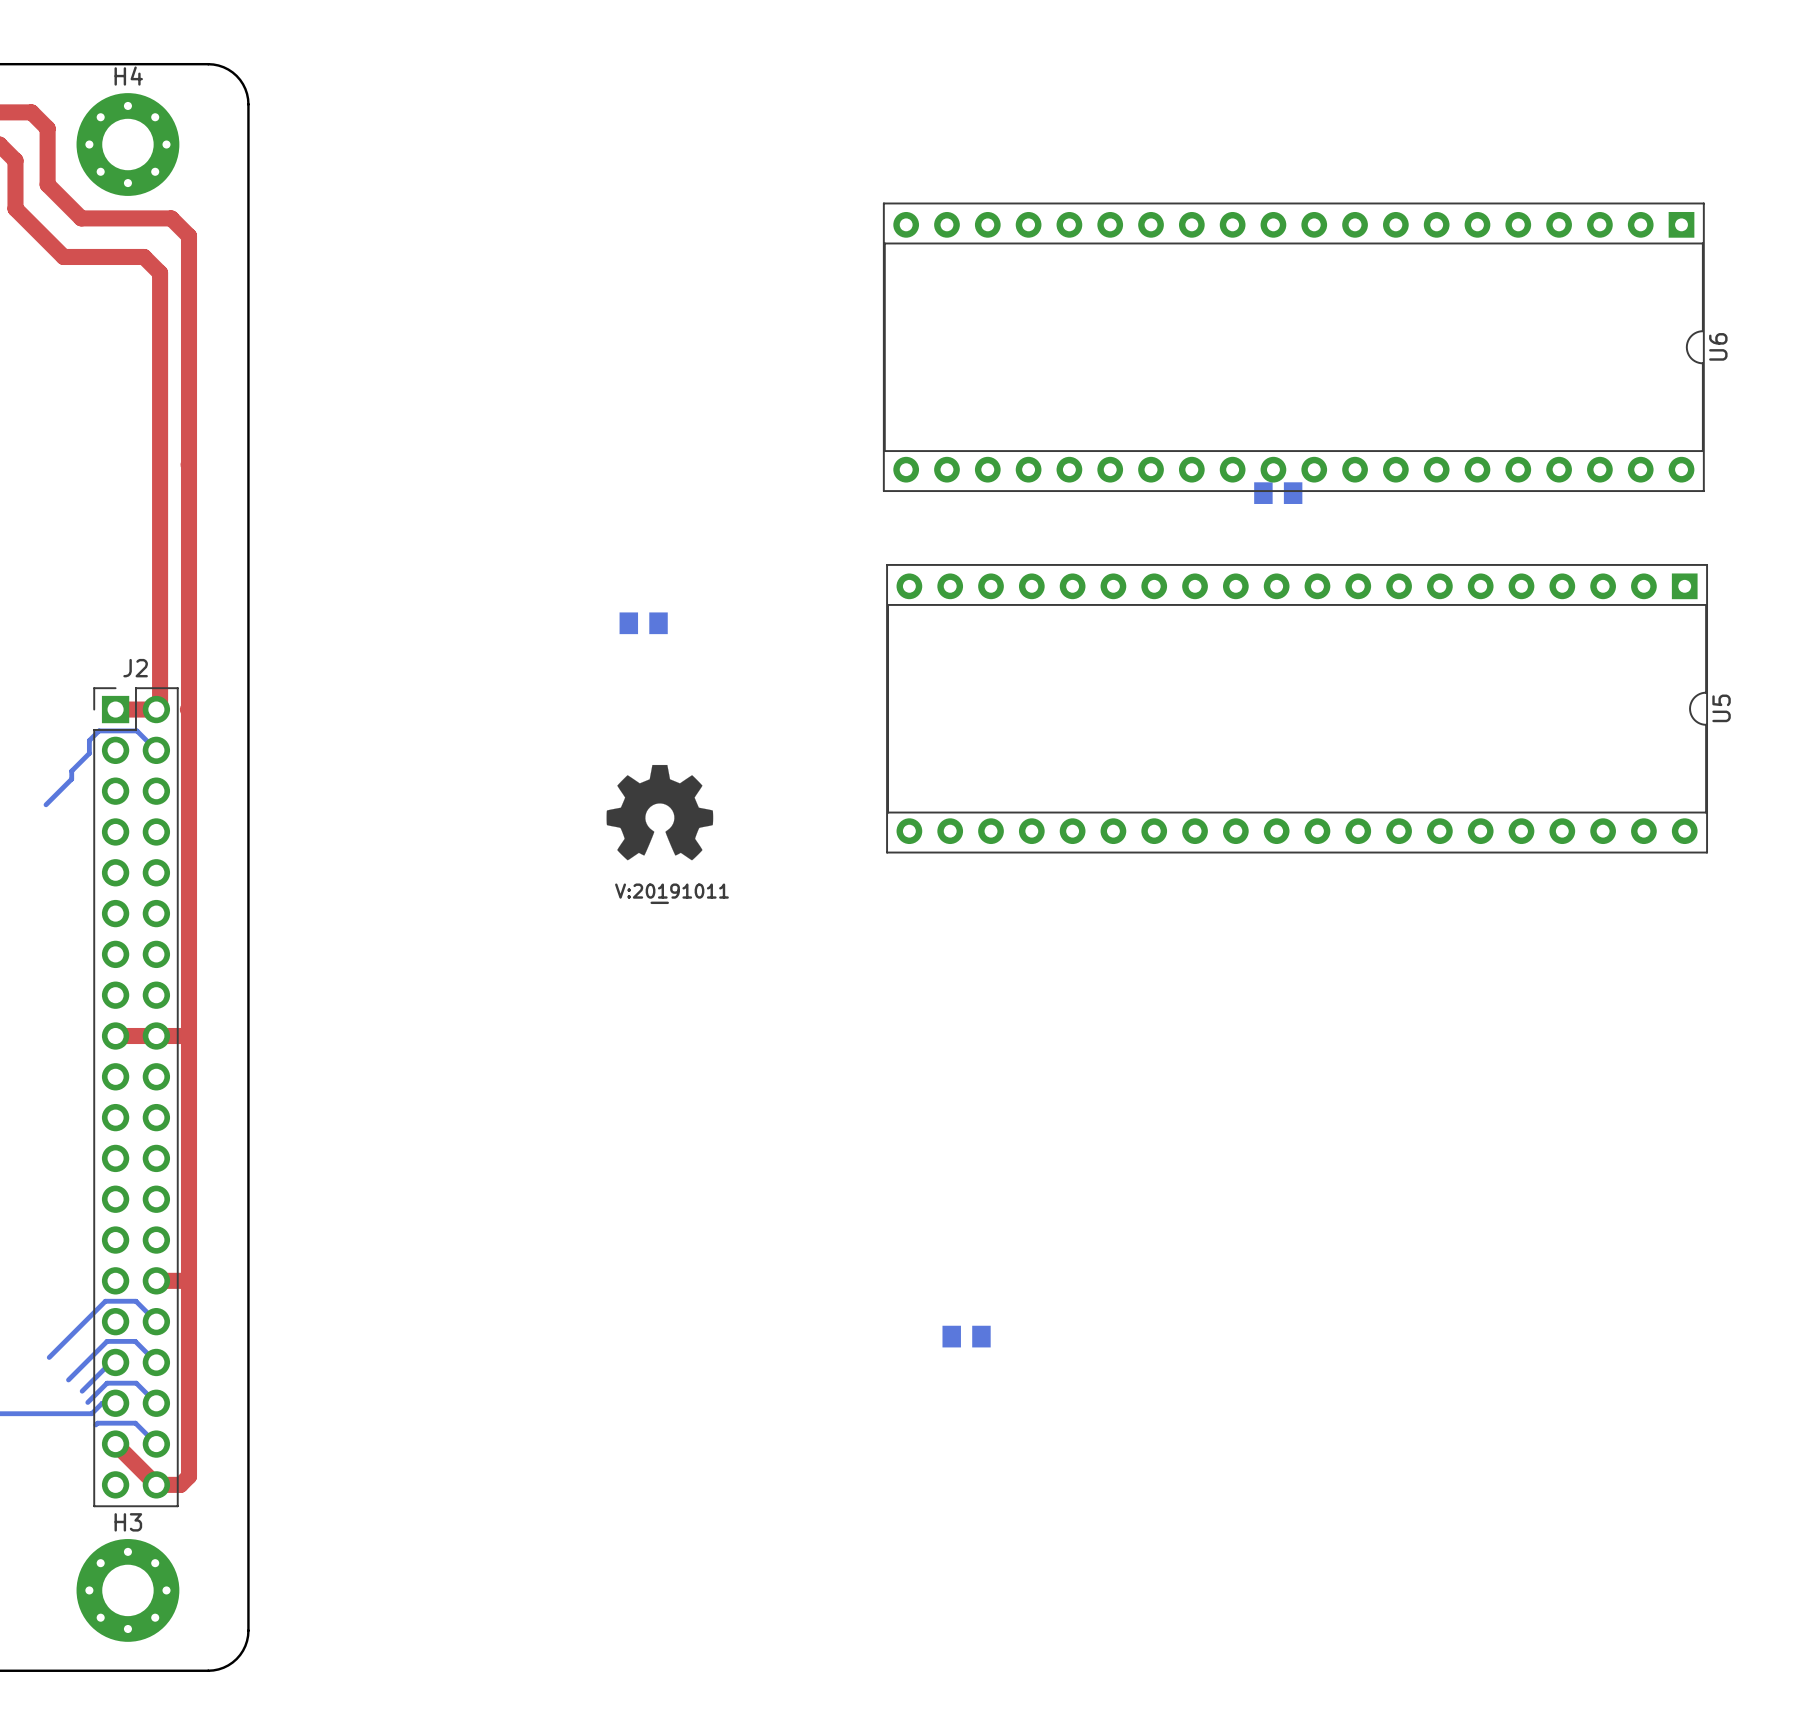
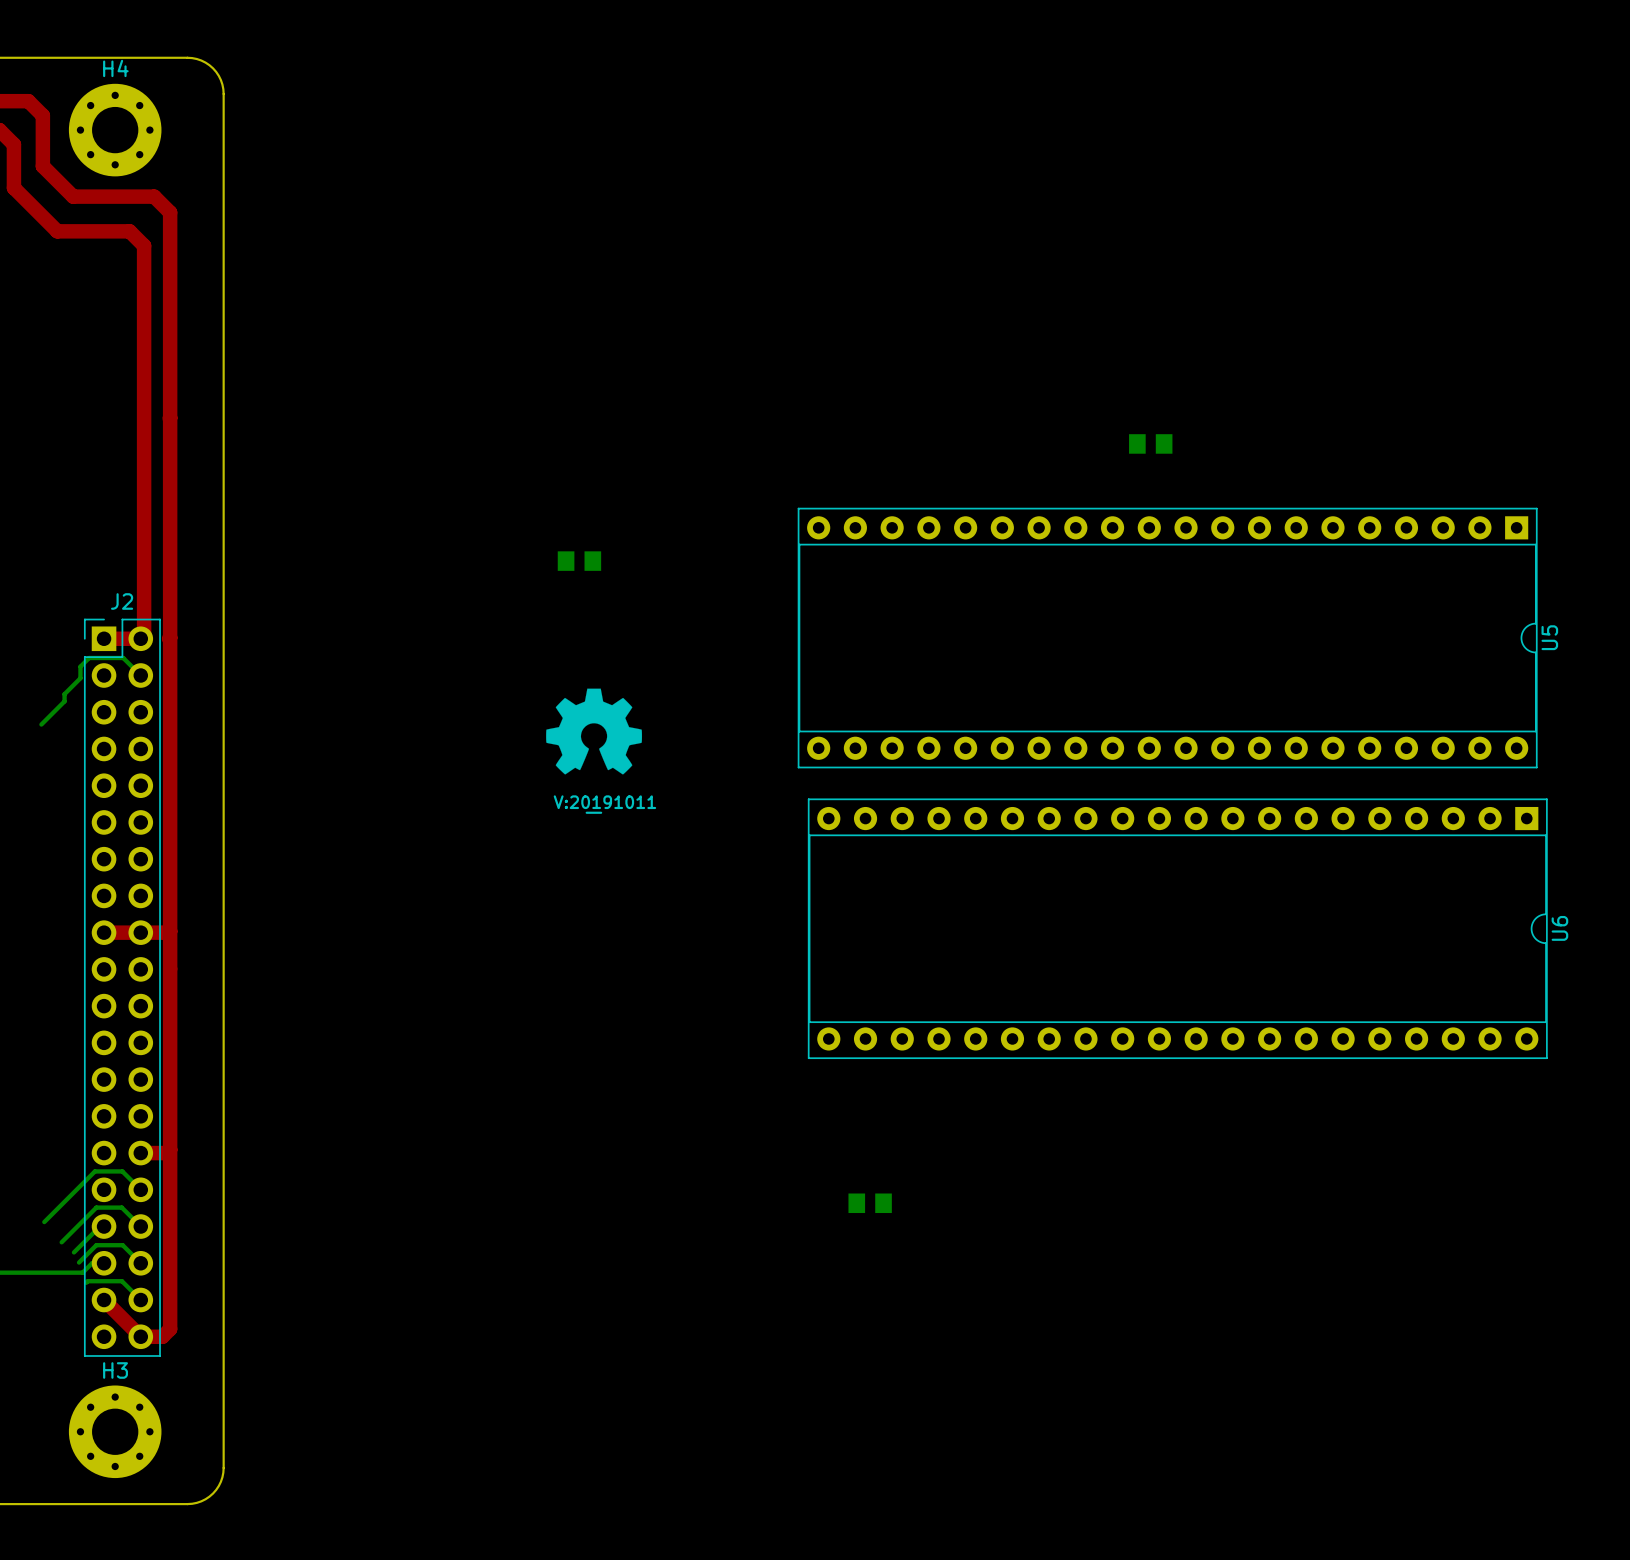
U6 position: (1293, 347) -> (1177, 928)

